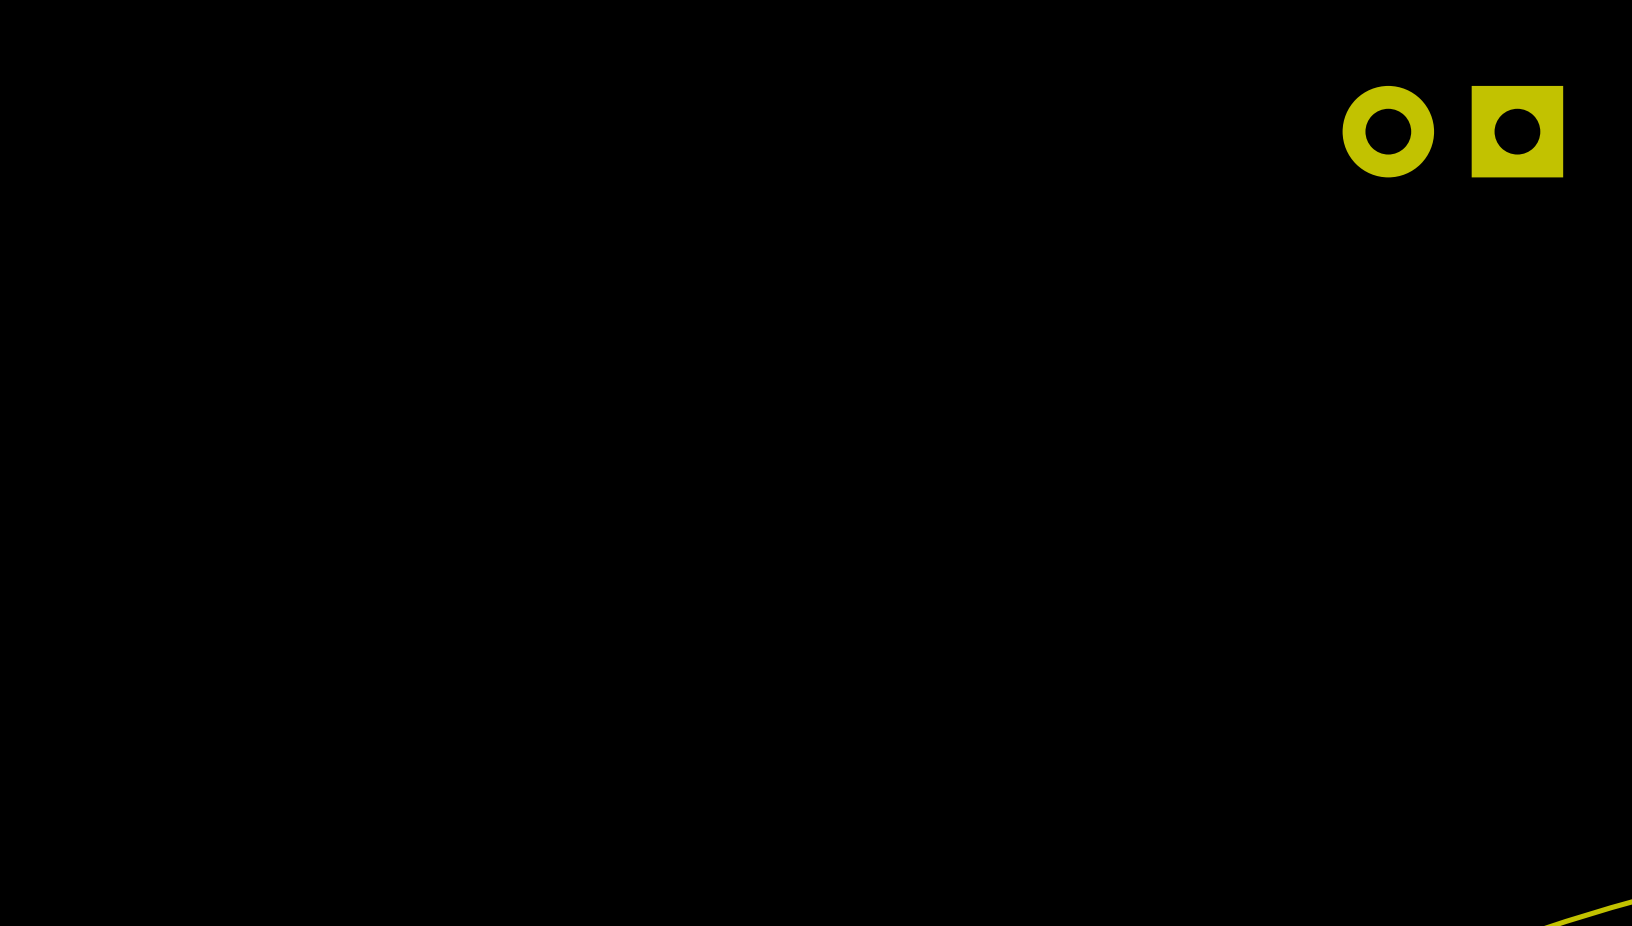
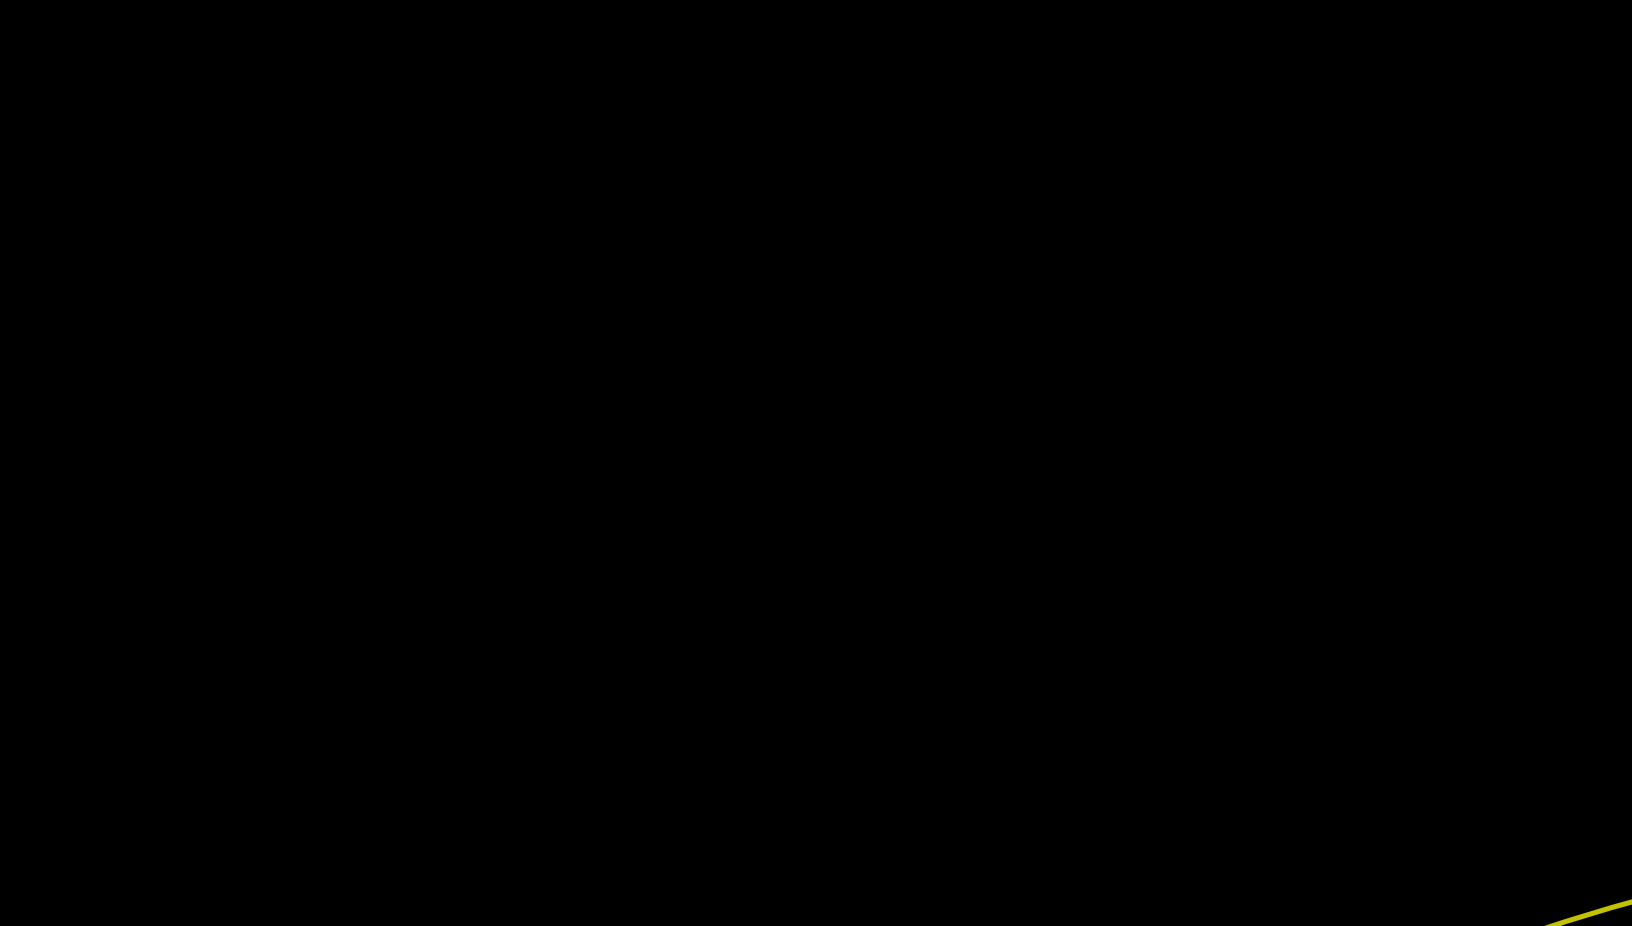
part: (1452, 131) -> none

